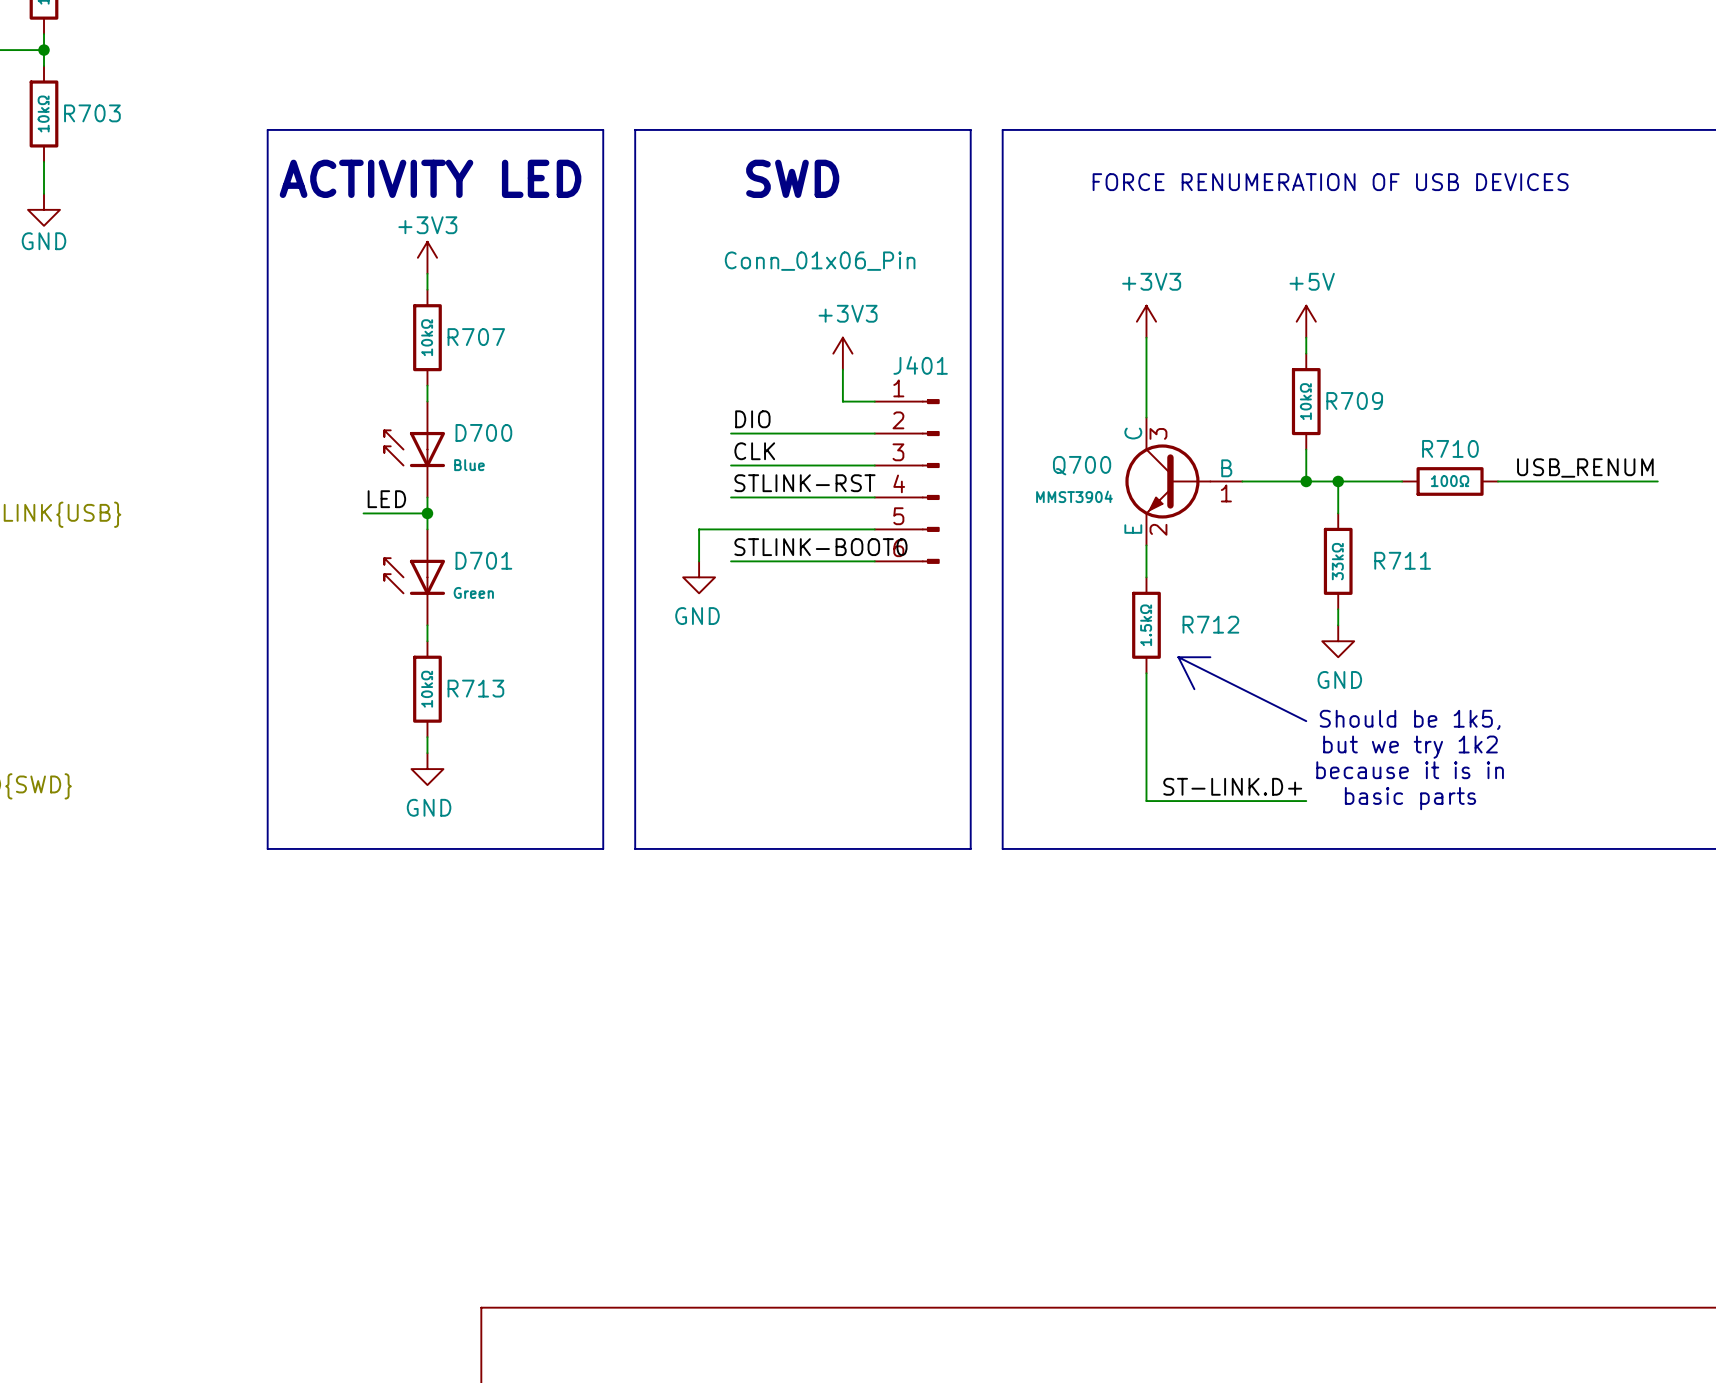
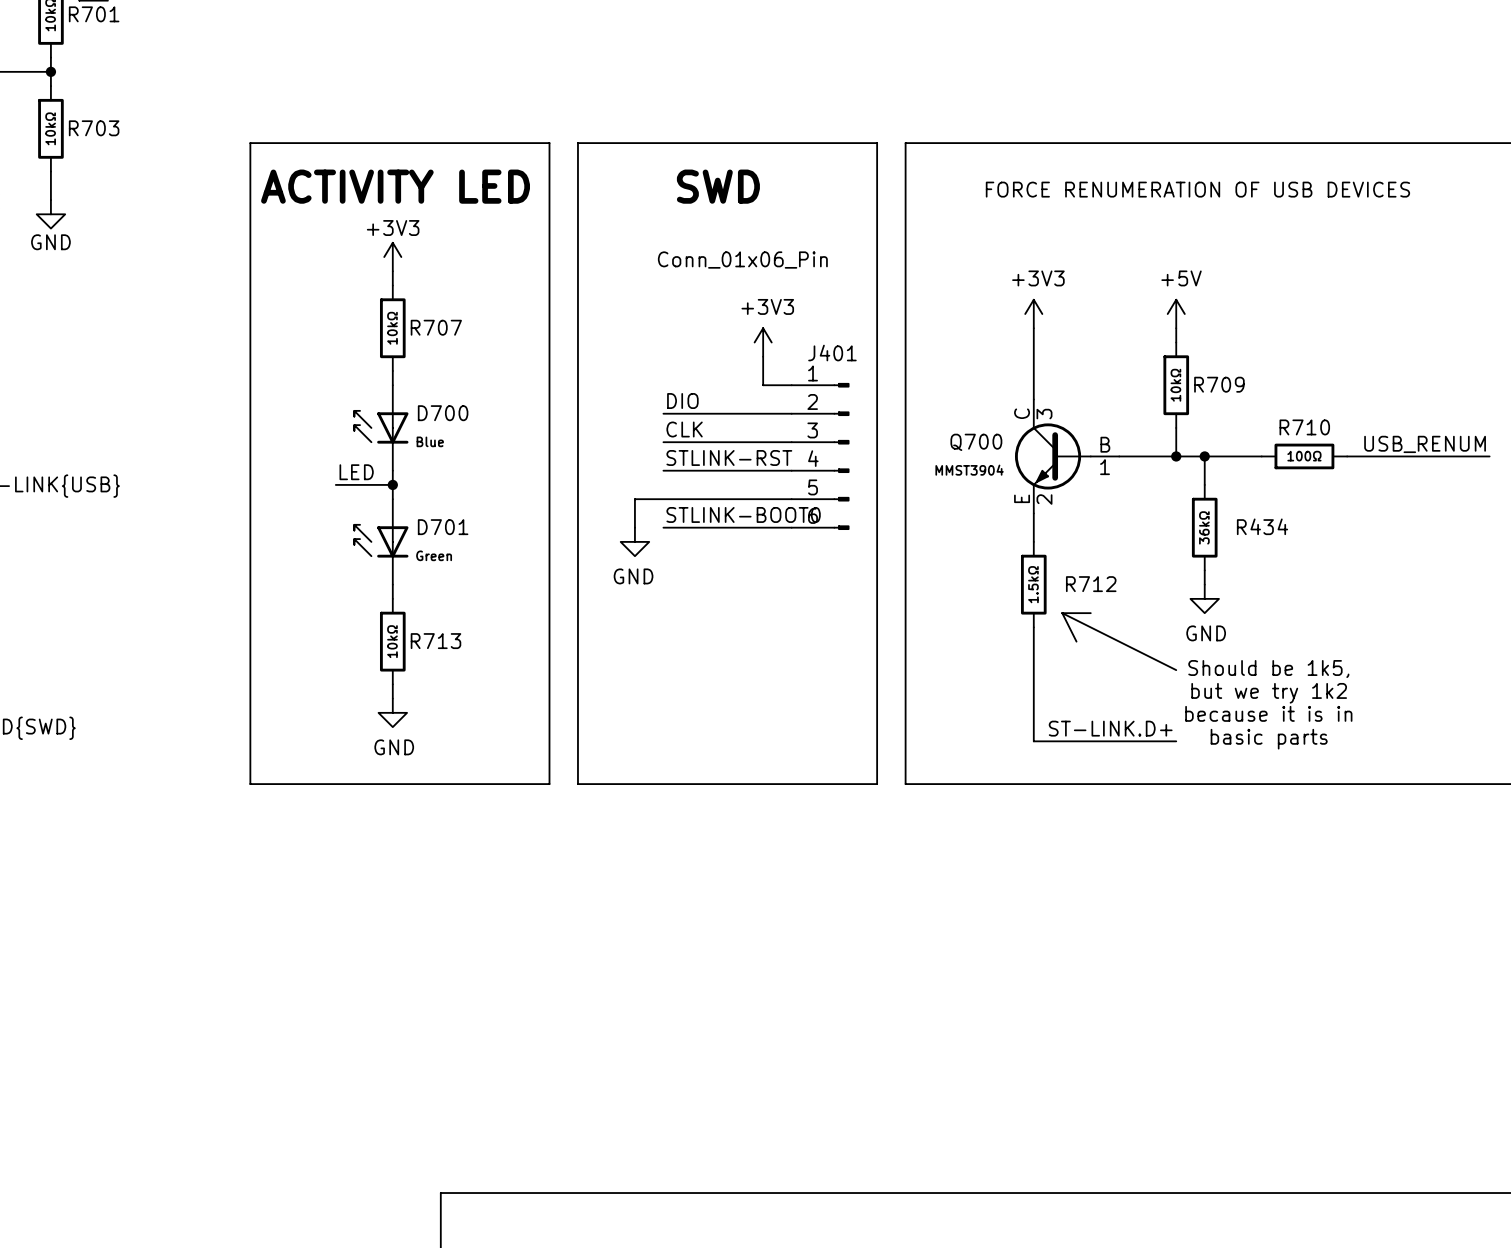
R711 name: R711 (1402, 560) -> R434 (1262, 526)
R711 value: 33kΩ (1337, 561) -> 36kΩ (1204, 527)

